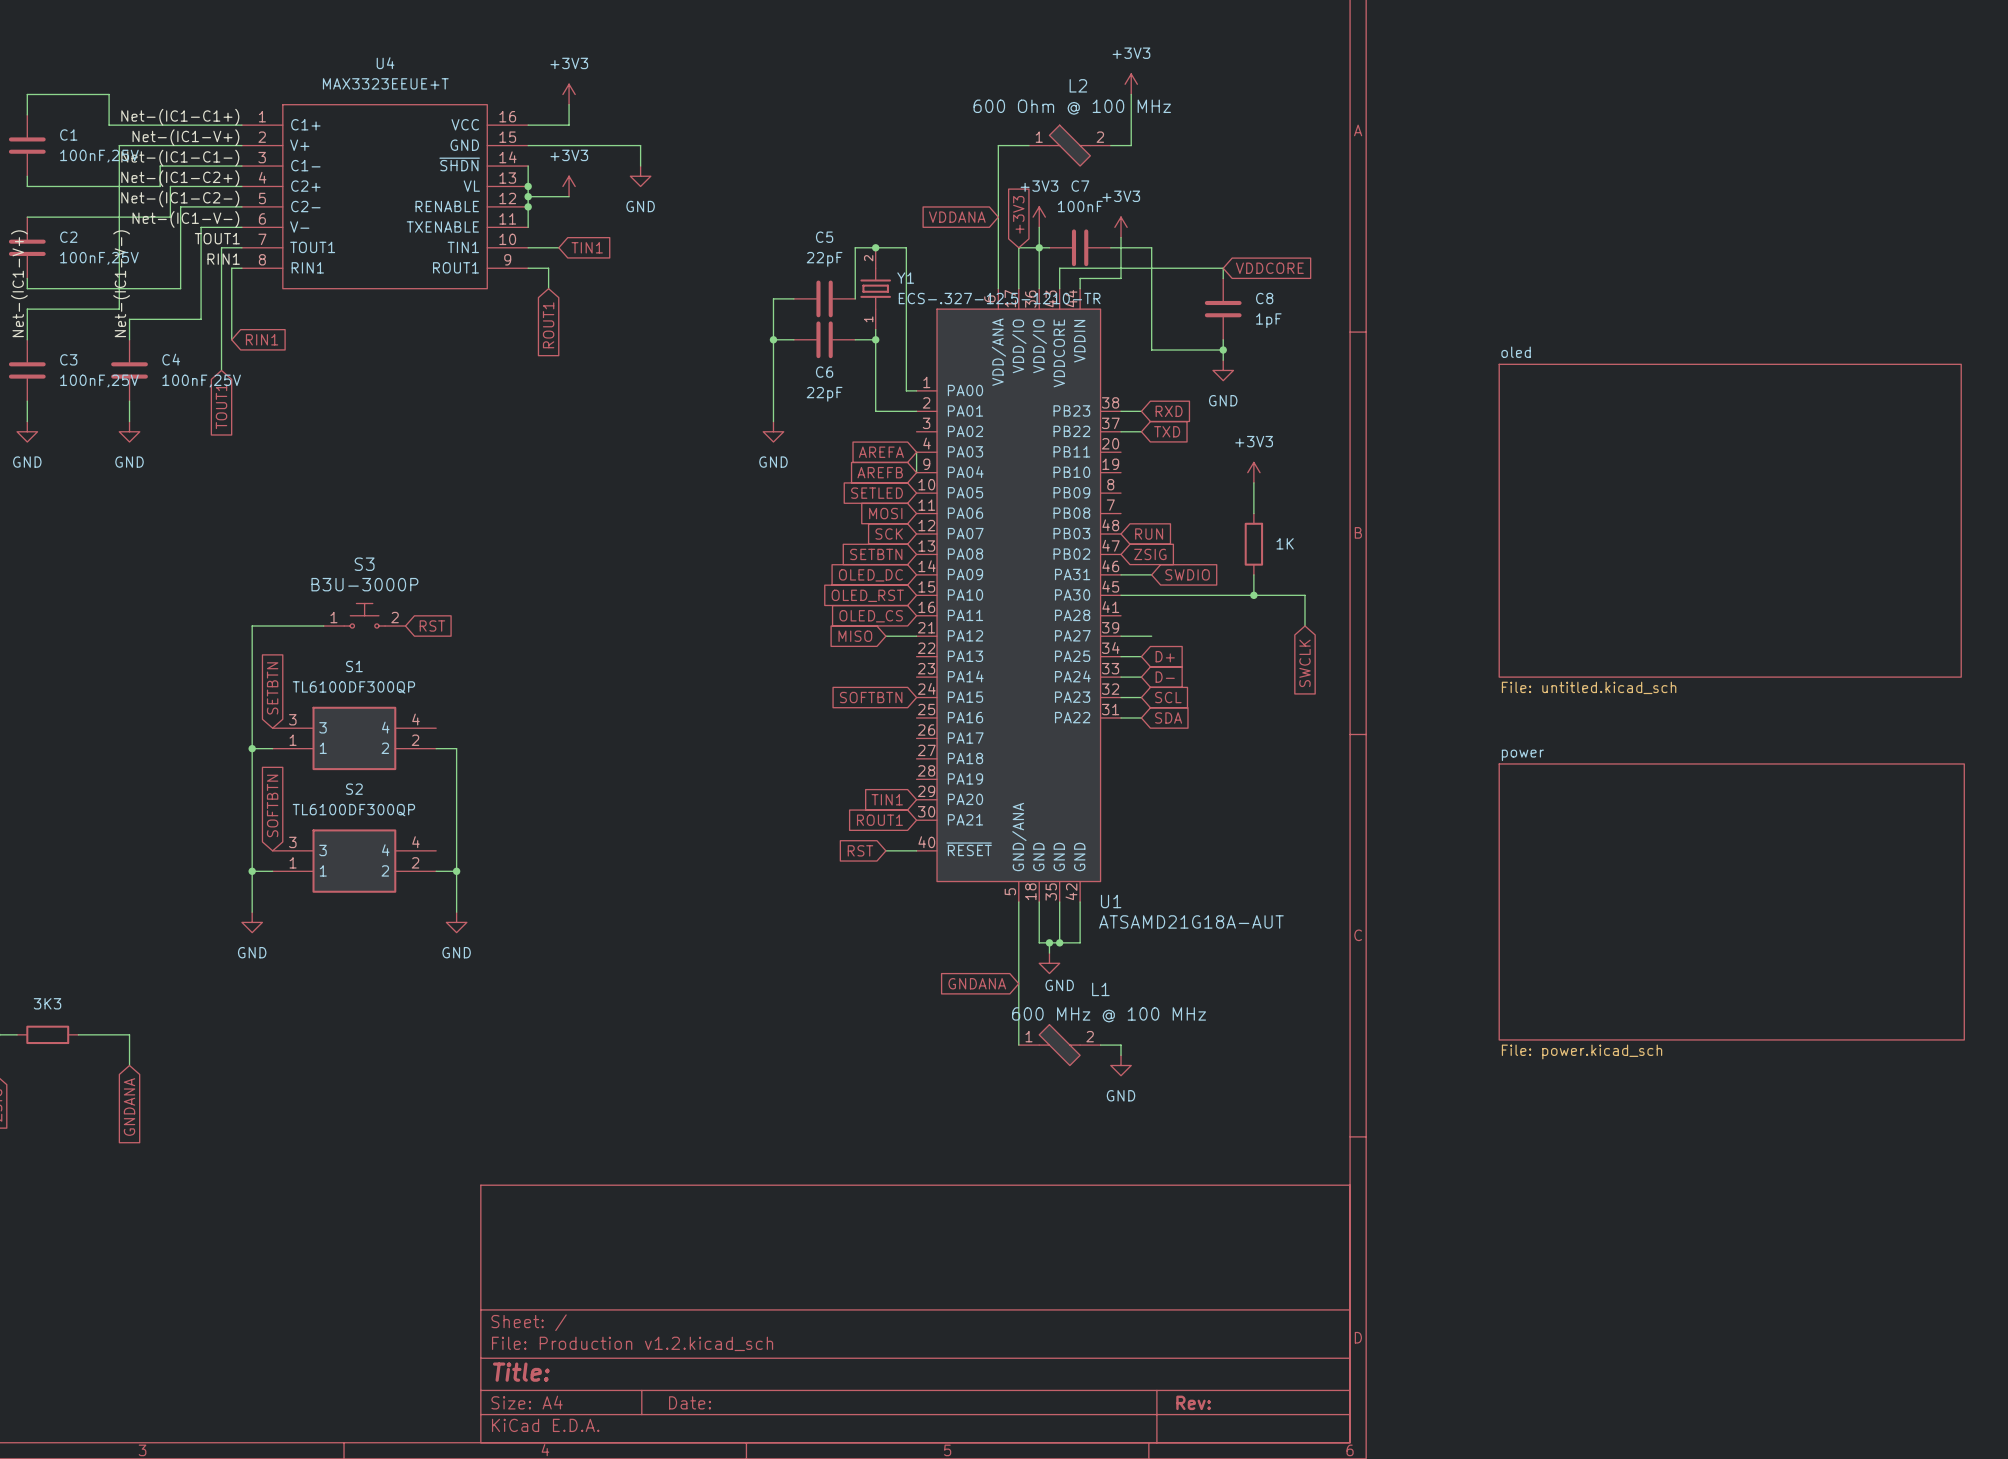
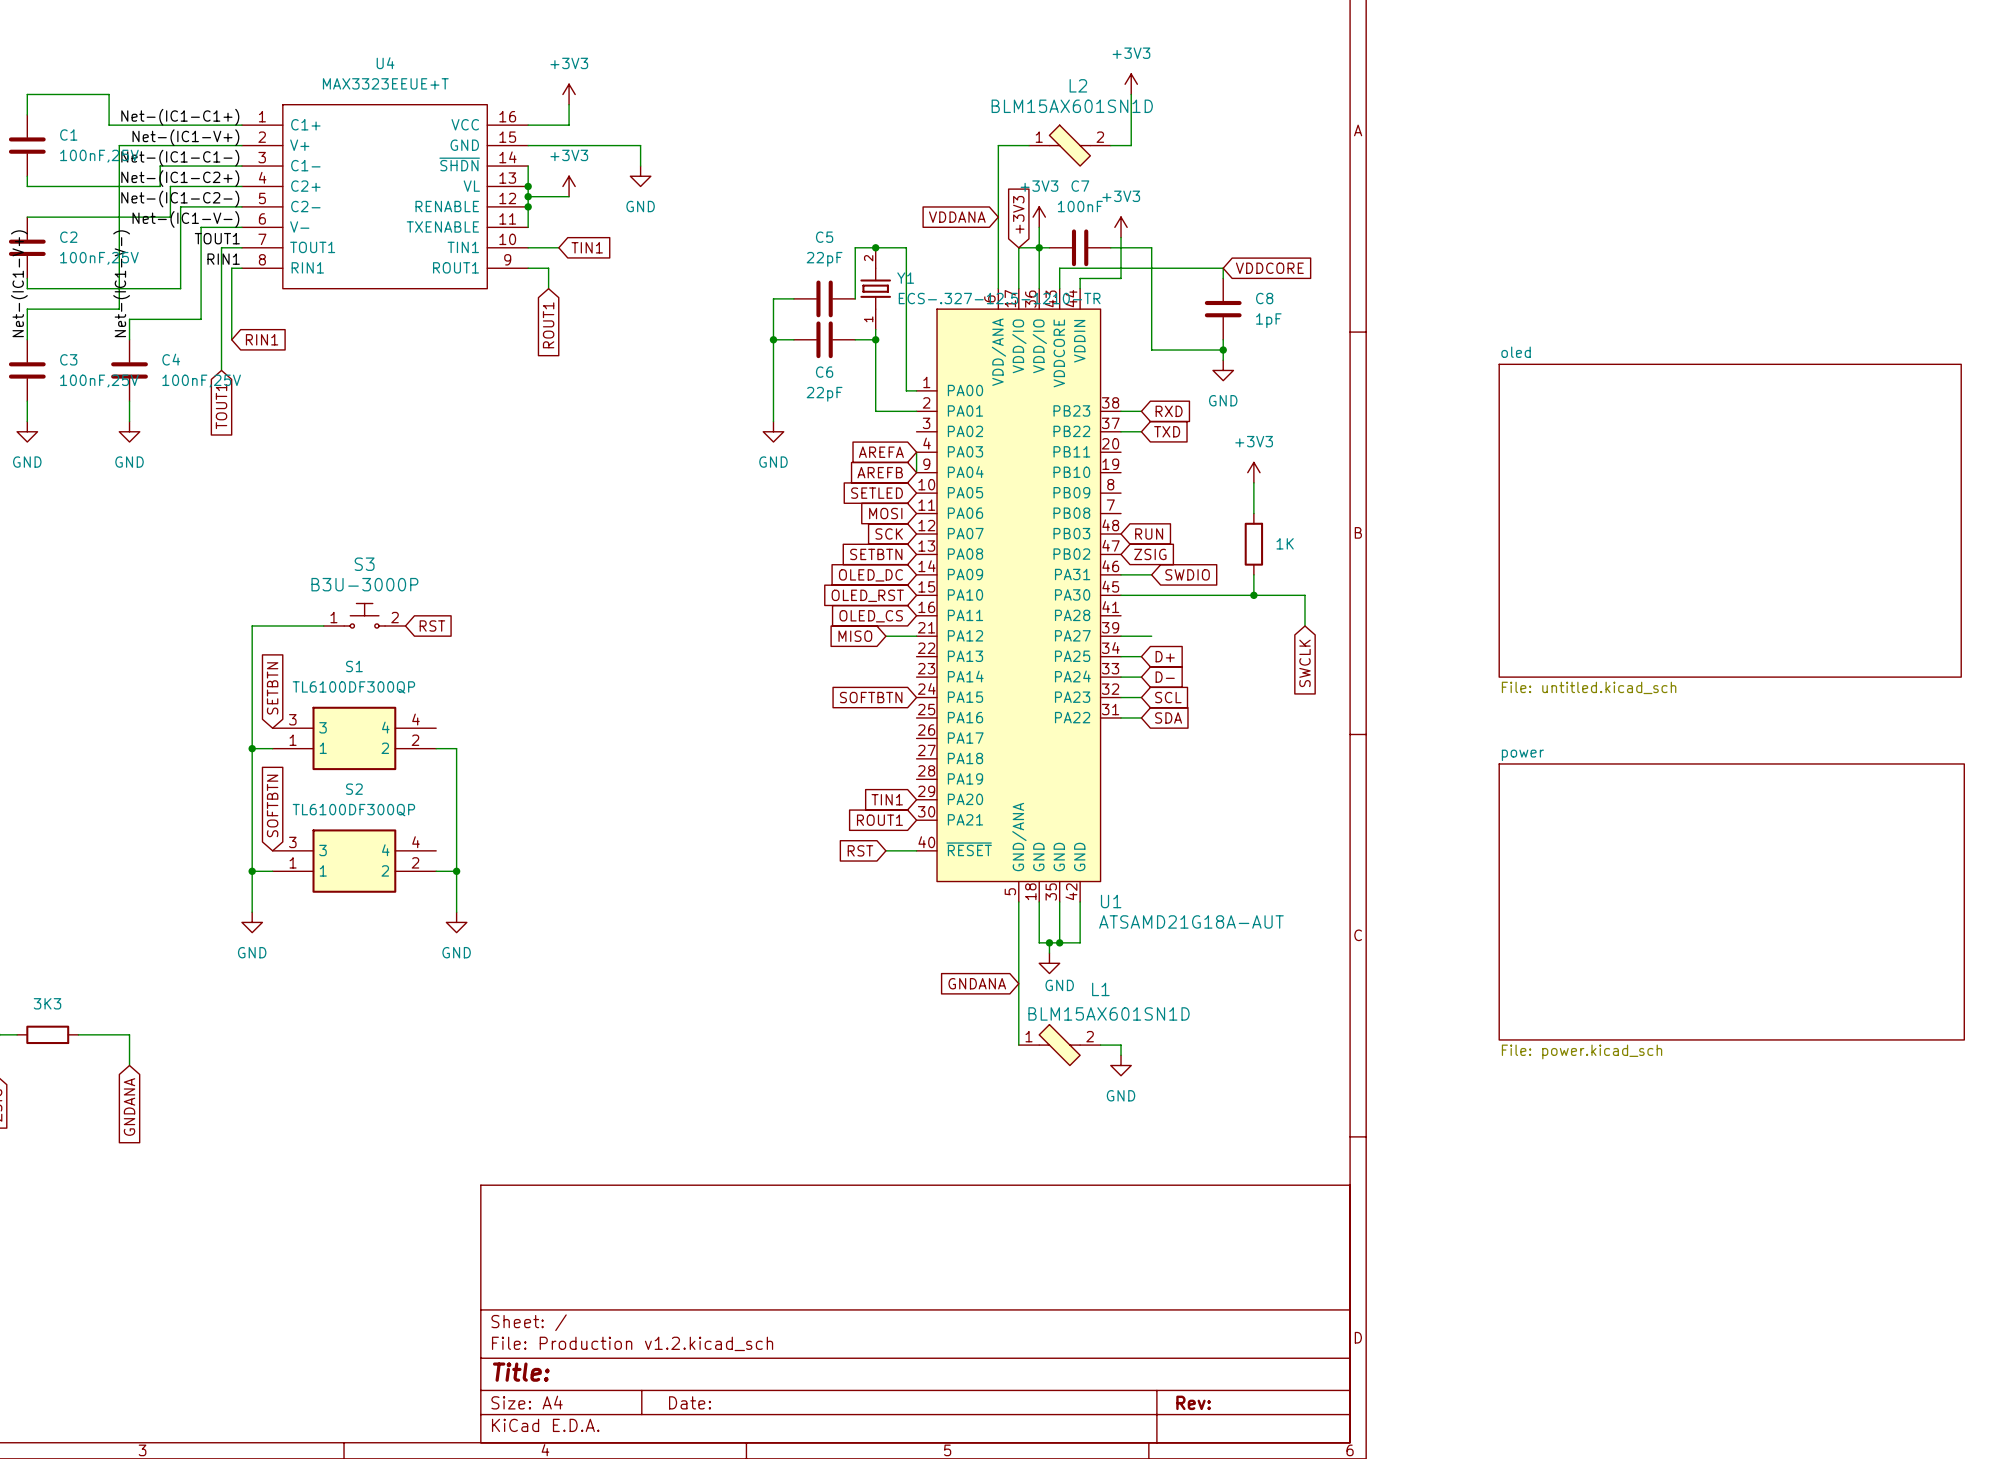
L2 value: 600 Ohm @ 100 MHz (1072, 107) -> BLM15AX601SN1D (1072, 106)
L1 value: 600 MHz @ 100 MHz (1109, 1014) -> BLM15AX601SN1D (1109, 1013)

